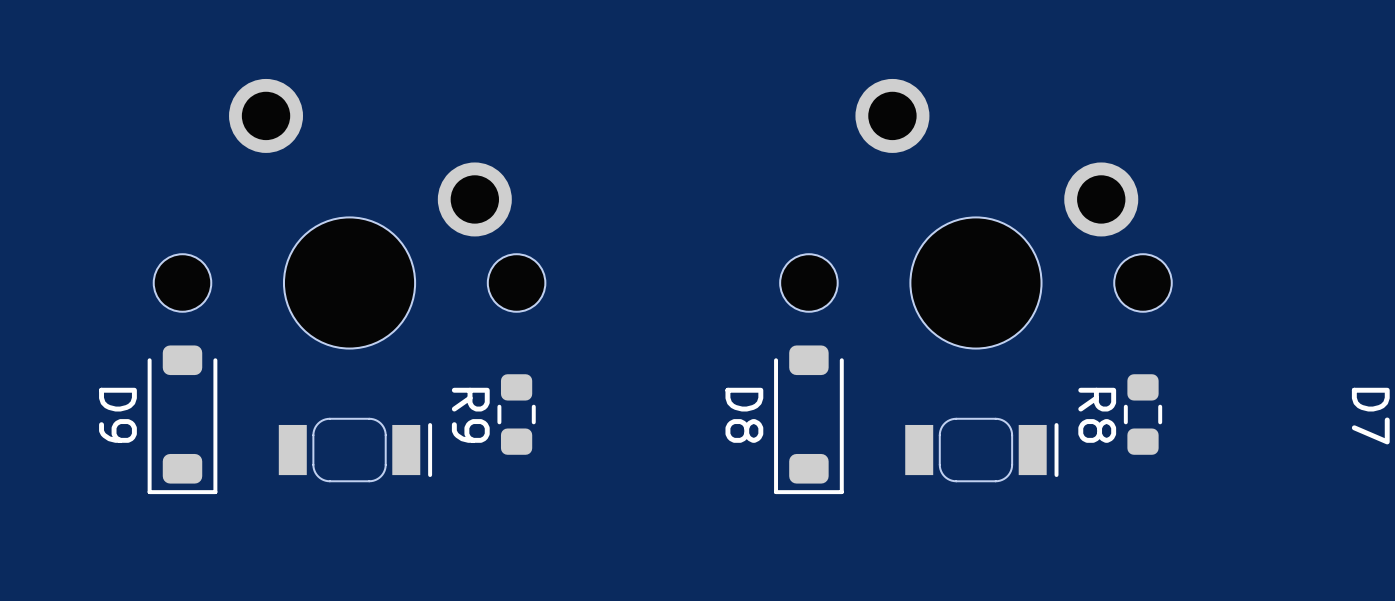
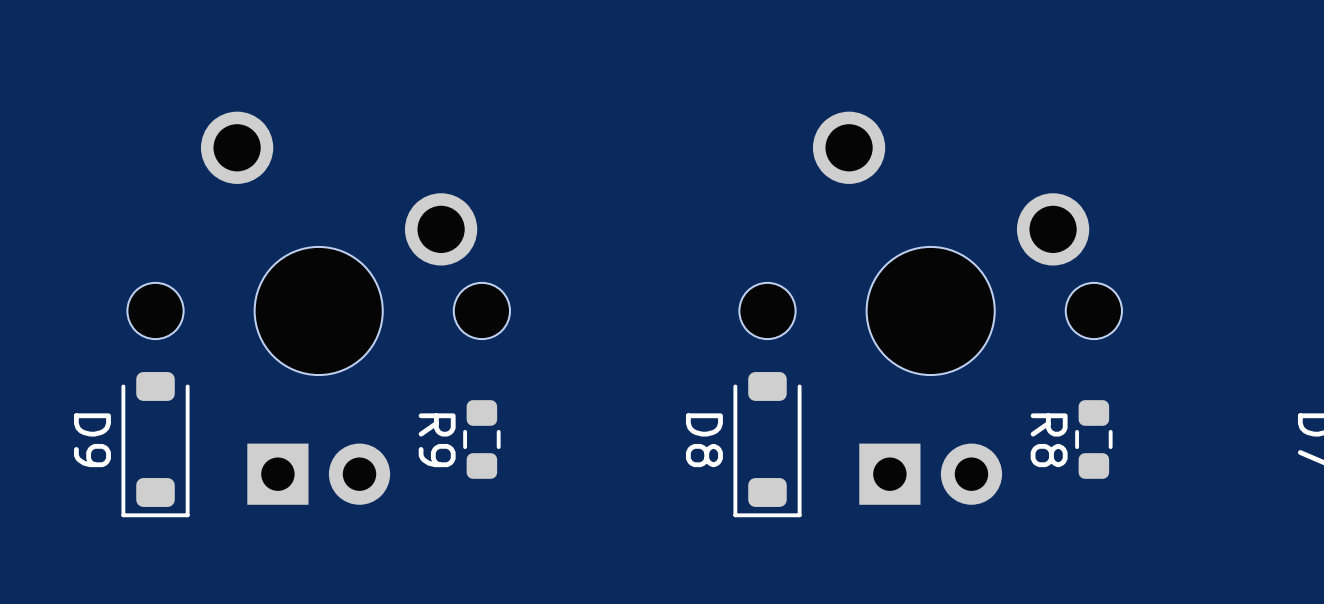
part: none -> (318, 308)
part: none -> (930, 308)
part: (355, 450) -> none
part: (981, 450) -> none

